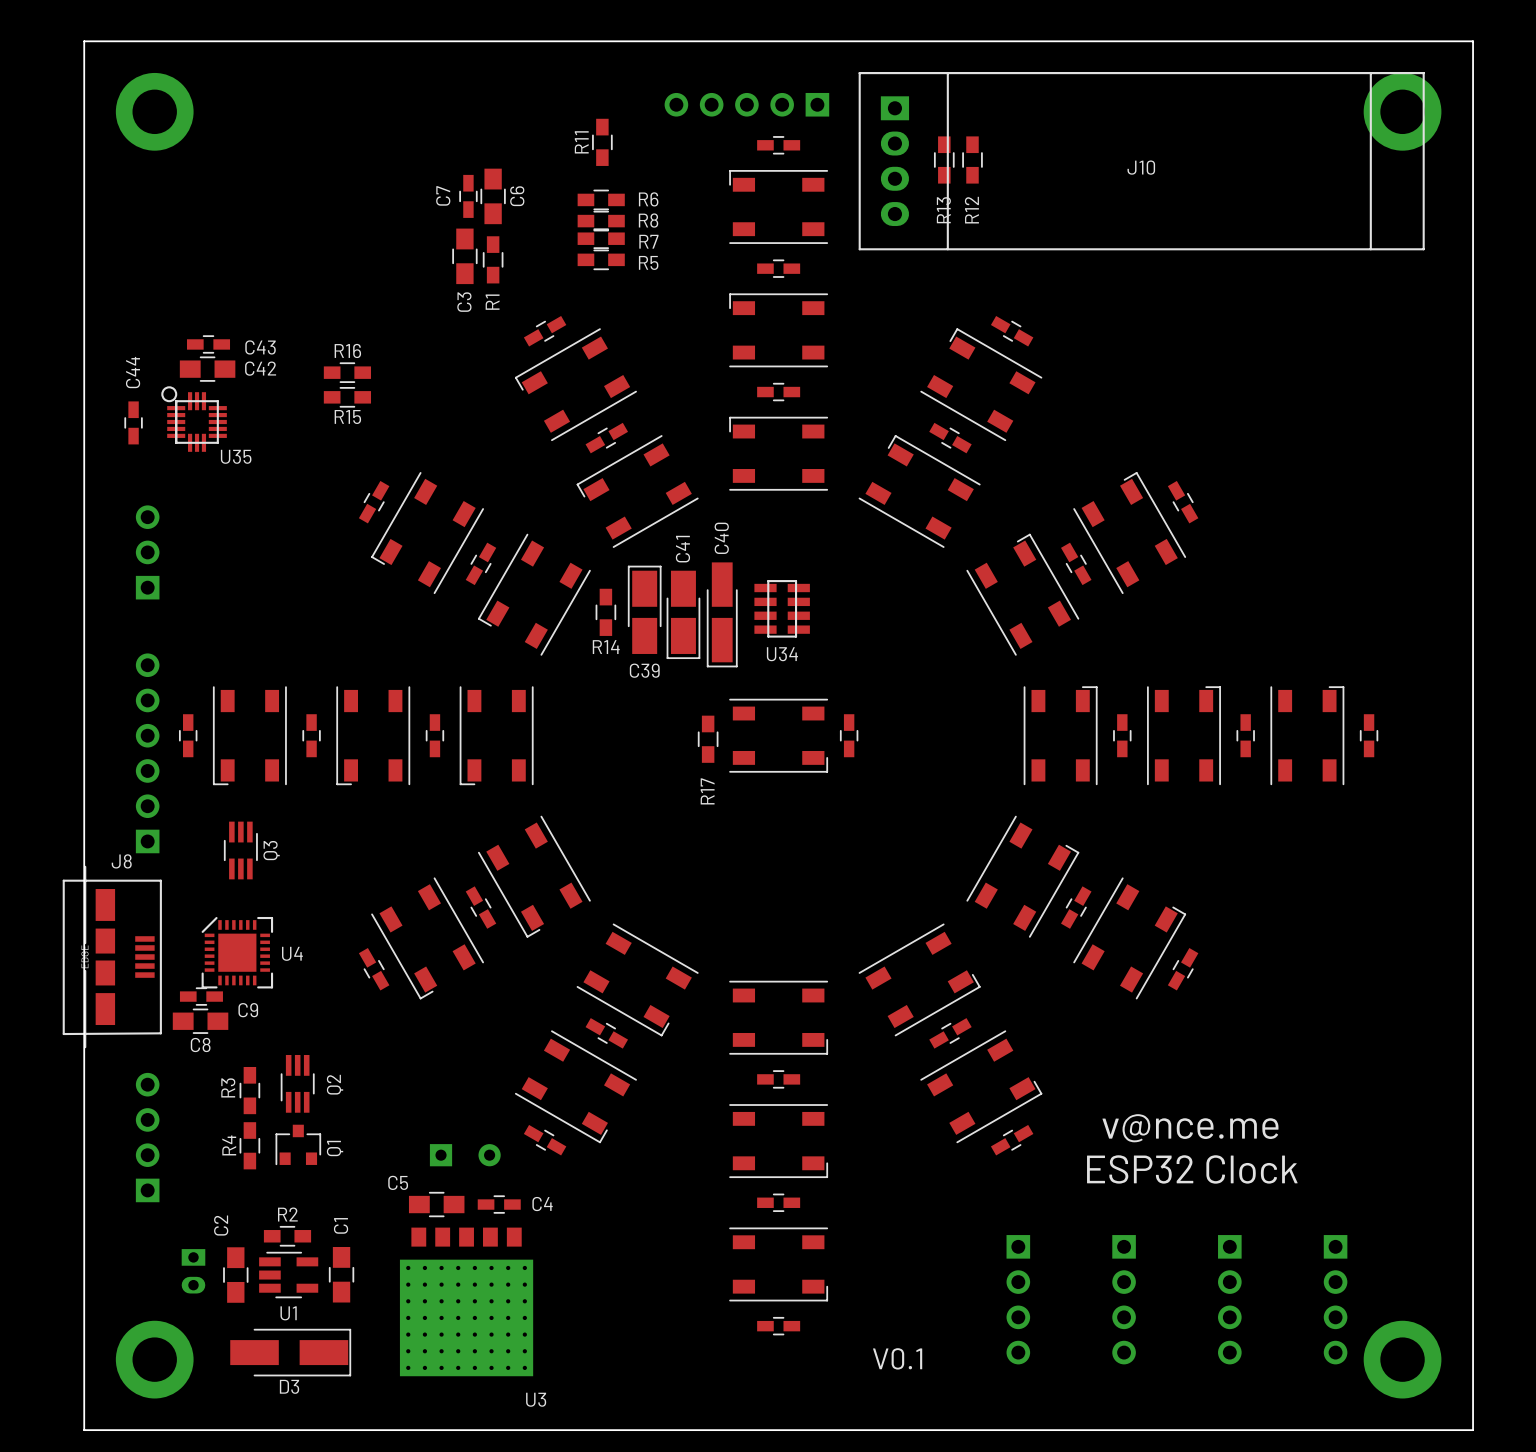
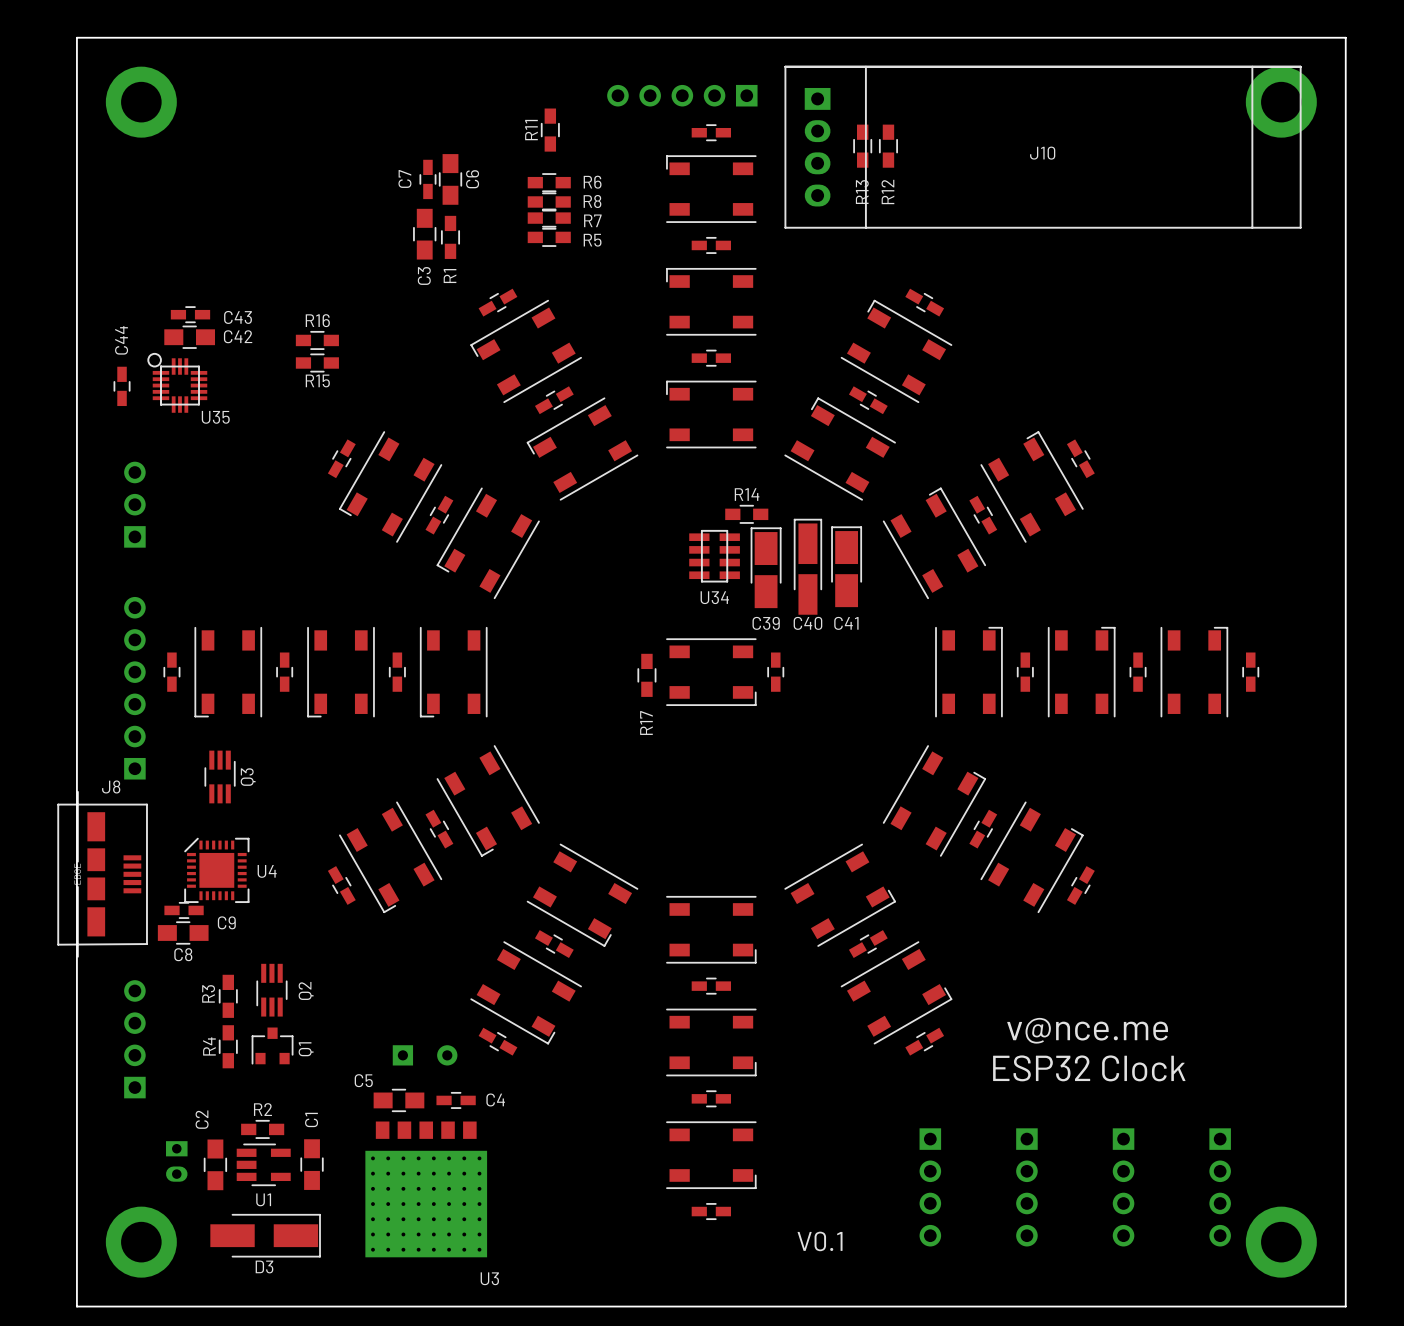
C39 position: (644, 609) -> (766, 567)
R14 rotation: 0° (605, 612) -> 90° clockwise (746, 514)
R14 position: (605, 612) -> (746, 514)
C41 rotation: 0° (683, 614) -> 180° (846, 566)
C41 position: (683, 614) -> (846, 566)
C40 rotation: 0° (722, 614) -> 180° (807, 566)
C40 position: (722, 614) -> (807, 566)
R14 name position: R14 (606, 647) -> R14 (747, 494)

